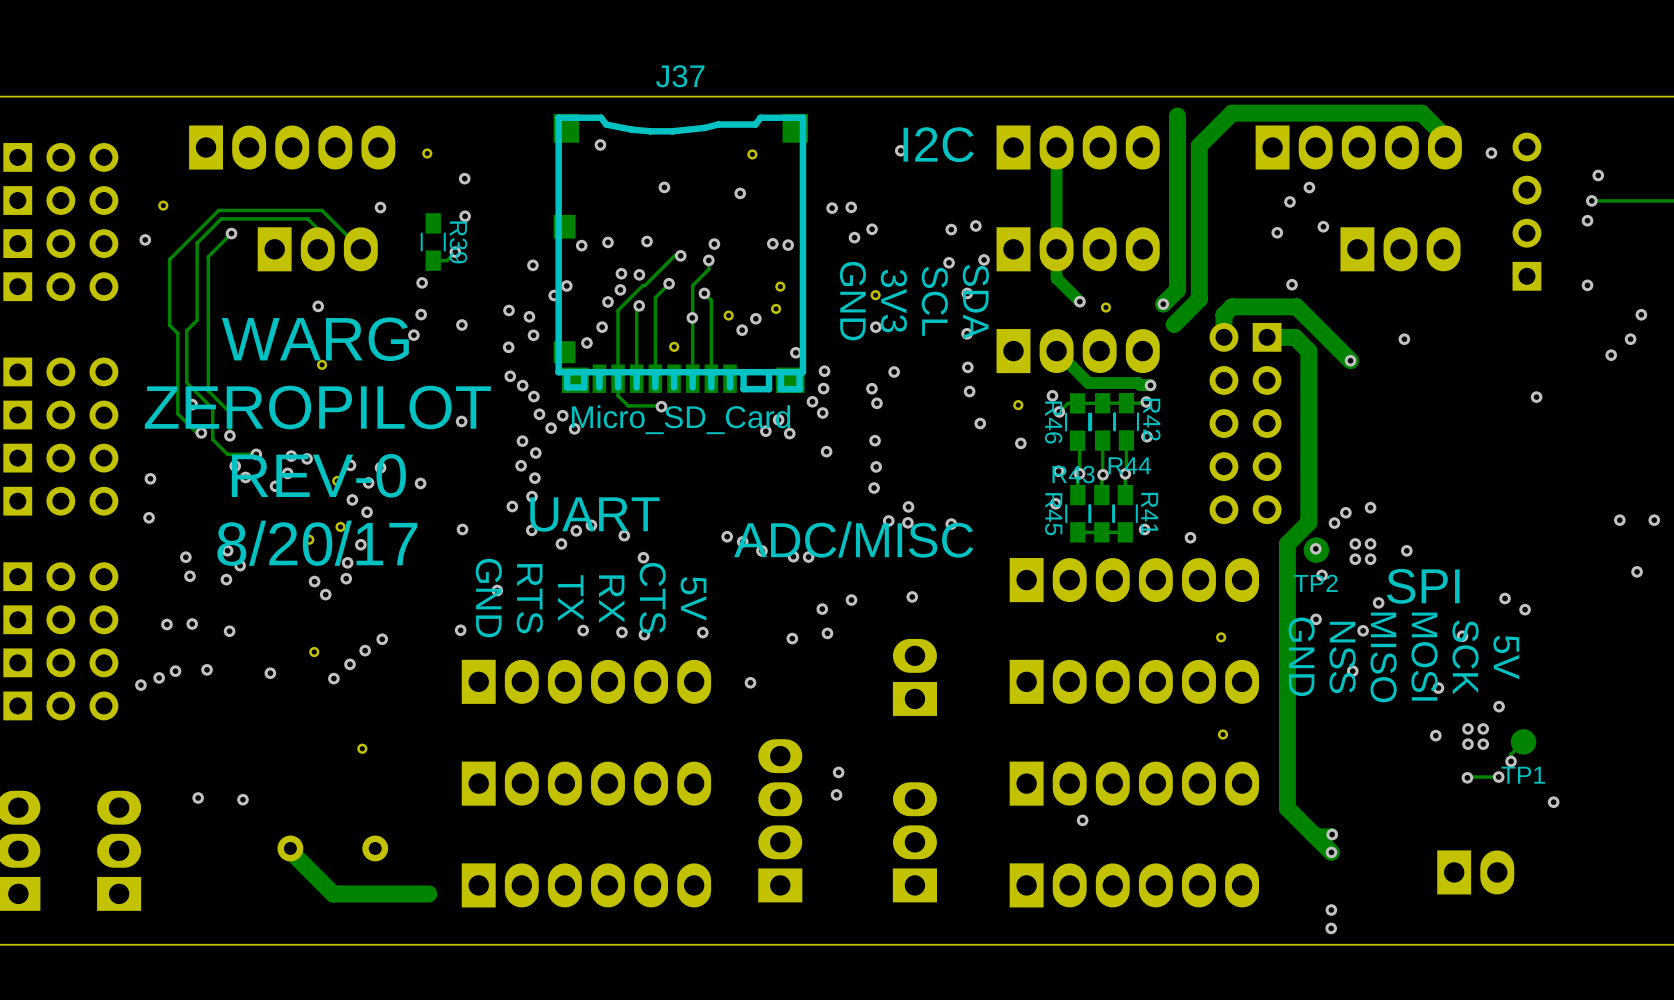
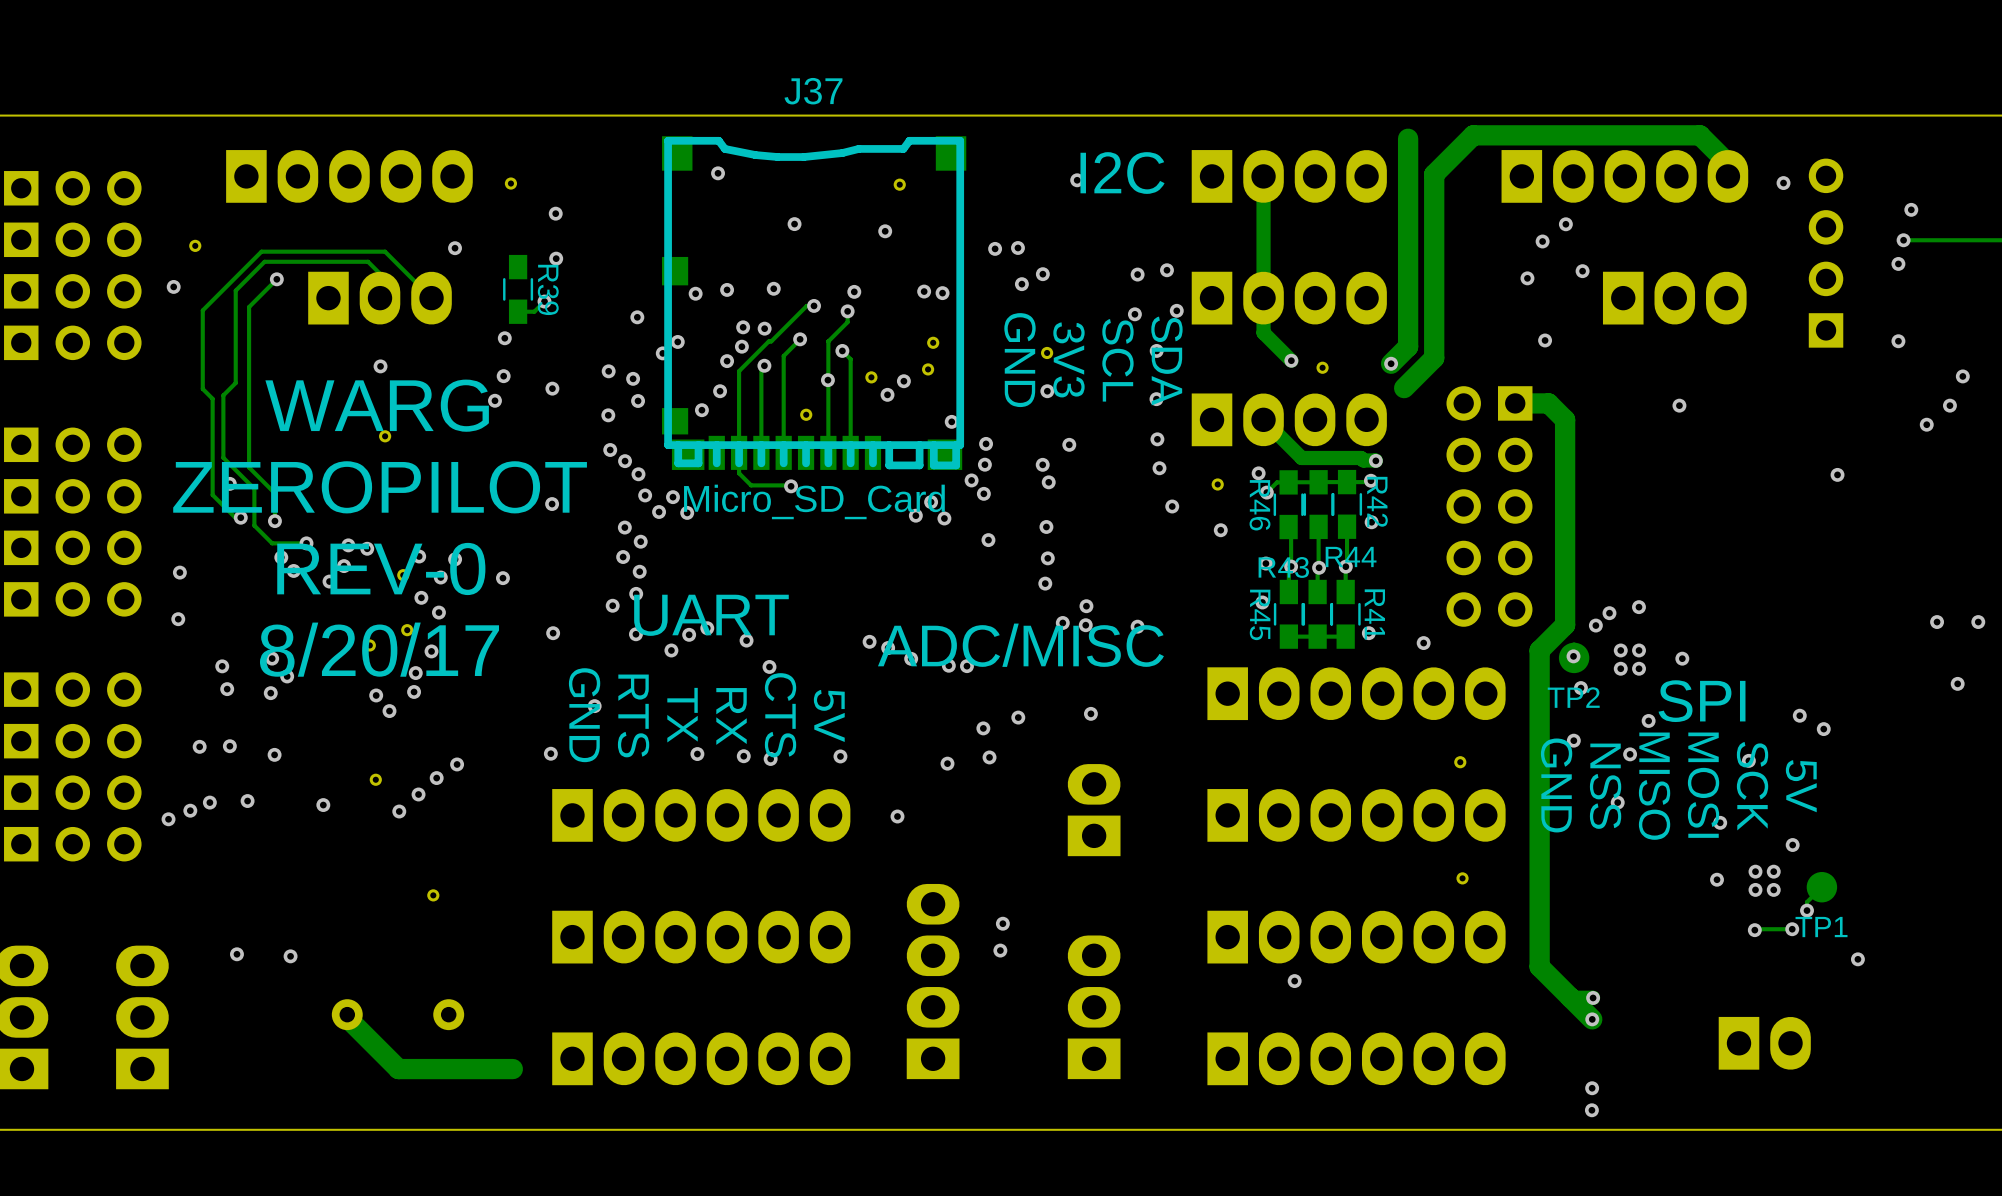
track: (1223, 337) (1223, 314) (1232, 306) (1296, 306) (1350, 360) -> none
via: (1350, 360) -> none

